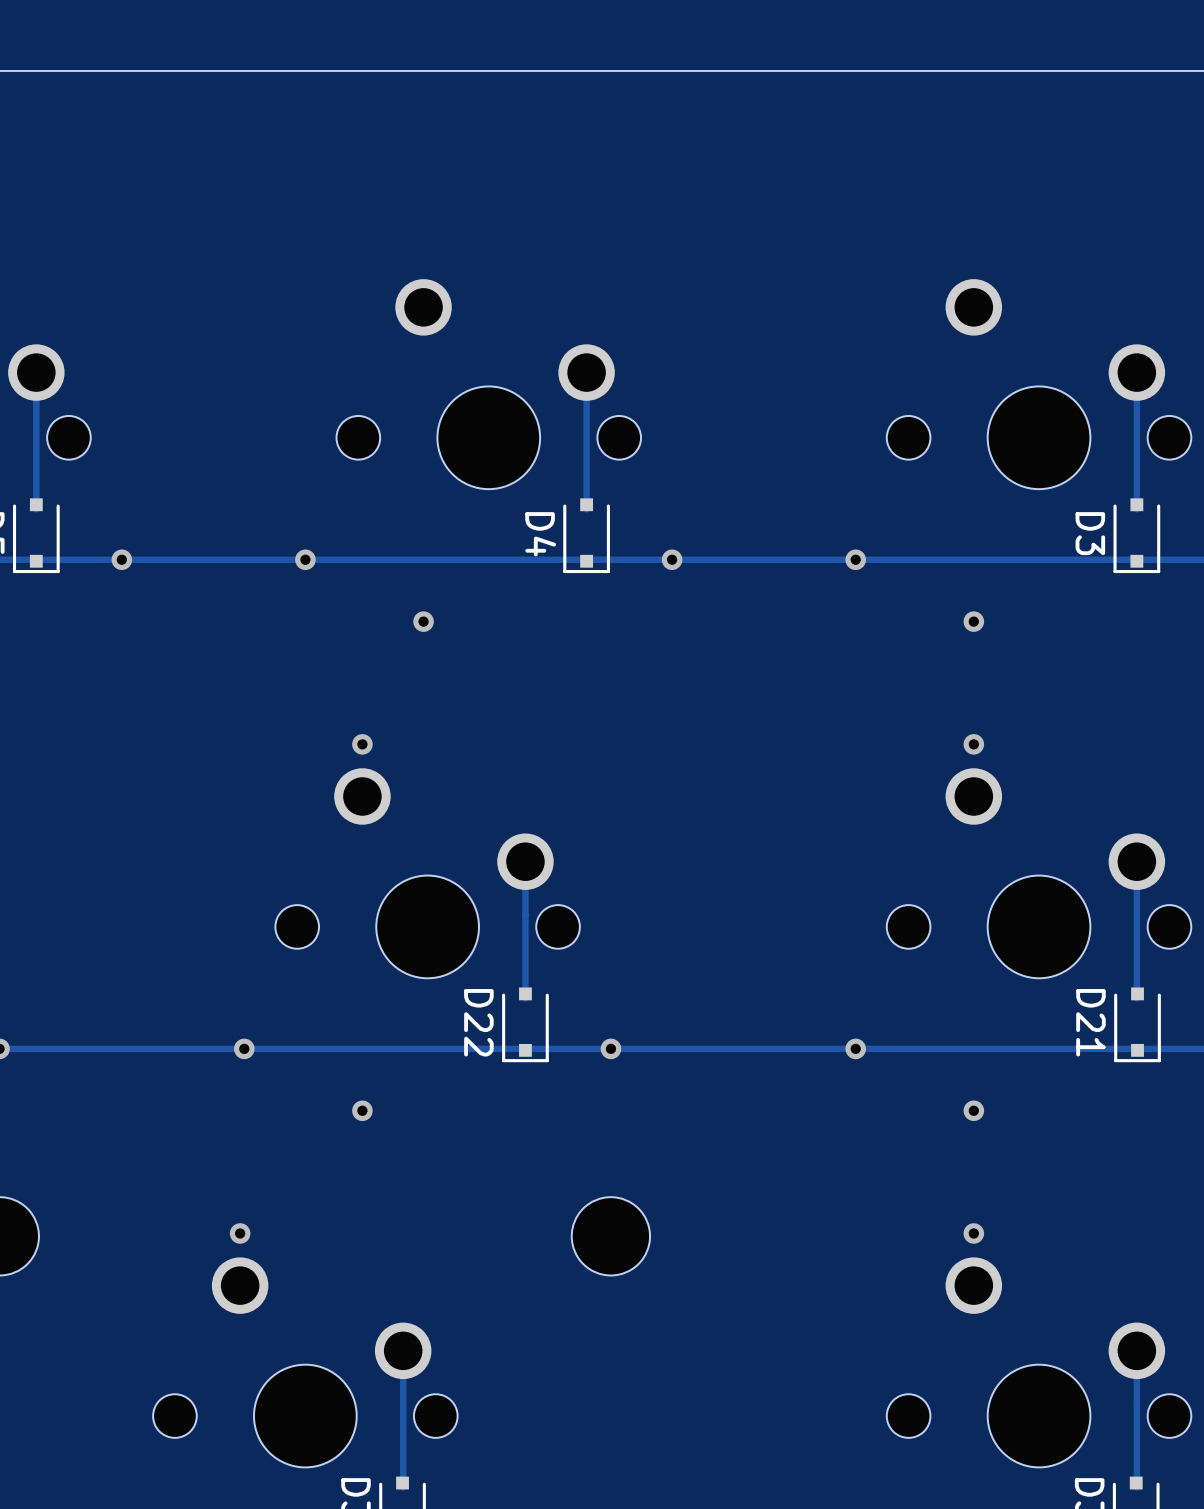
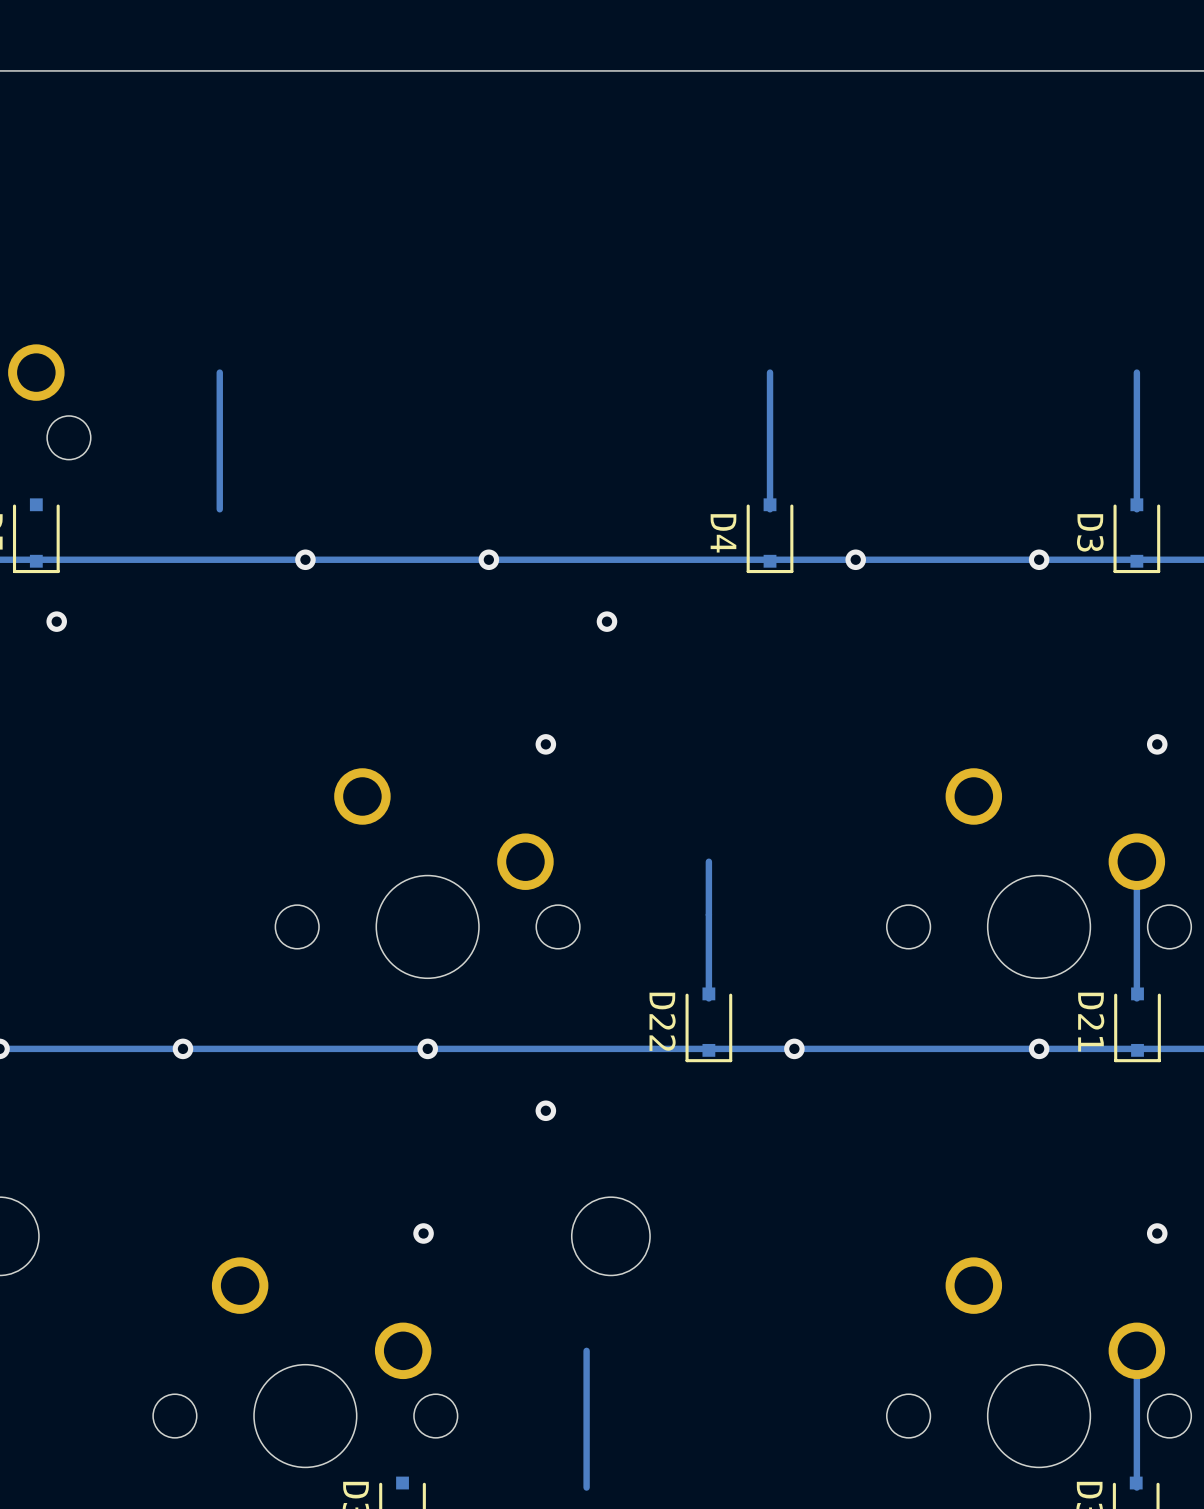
track: (36, 372) (36, 509) -> (219, 372) (219, 509)
track: (586, 372) (586, 509) -> (770, 372) (770, 509)
part: (488, 384) -> none
part: (1039, 384) -> none
D4 position: (586, 535) -> (770, 535)
via position: (121, 559) -> (56, 621)
via: none -> (488, 559)
via position: (672, 559) -> (606, 621)
via: (423, 621) -> none
via position: (973, 621) -> (1039, 559)
via: (362, 744) -> none
via: none -> (545, 744)
via: (973, 744) -> none
via: none -> (1157, 744)
track: (525, 861) (525, 998) -> (708, 861) (708, 998)
D22 position: (525, 1024) -> (708, 1024)
via position: (244, 1048) -> (182, 1048)
via: none -> (427, 1048)
via position: (610, 1048) -> (545, 1110)
via position: (855, 1048) -> (794, 1048)
via: (362, 1110) -> none
via position: (973, 1110) -> (1039, 1048)
via: (240, 1233) -> none
via: none -> (423, 1233)
via: (973, 1233) -> none
via: none -> (1157, 1233)
track: (403, 1350) (403, 1487) -> (586, 1350) (586, 1487)

